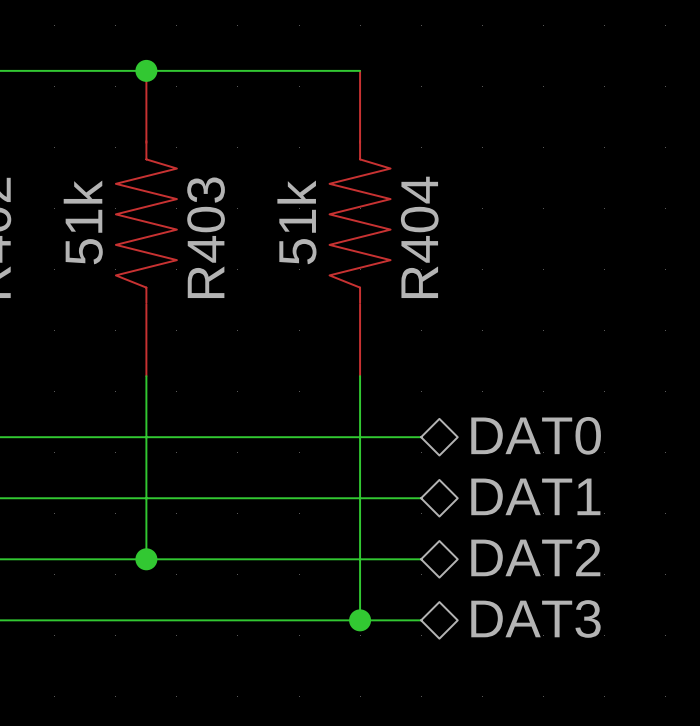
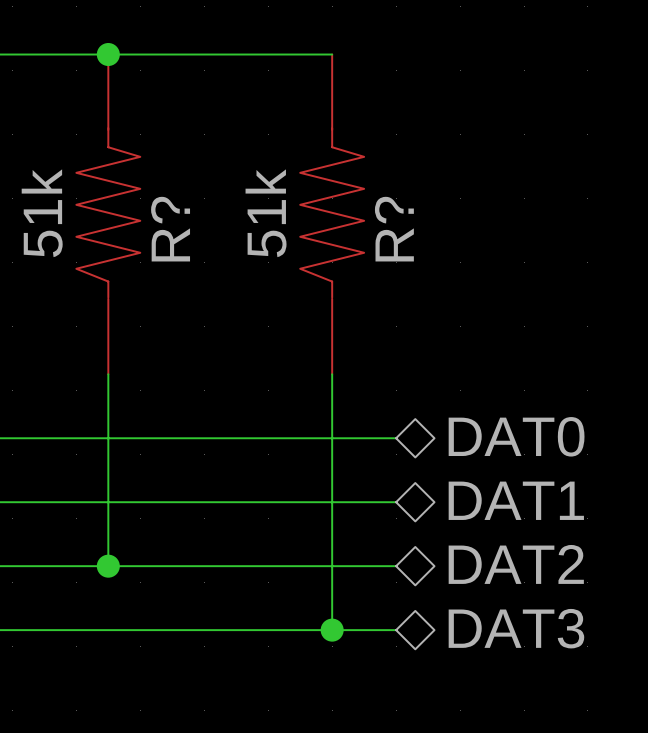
R403 name: R403 (206, 237) -> R? (170, 229)
R404 name: R404 (419, 237) -> R? (394, 229)

